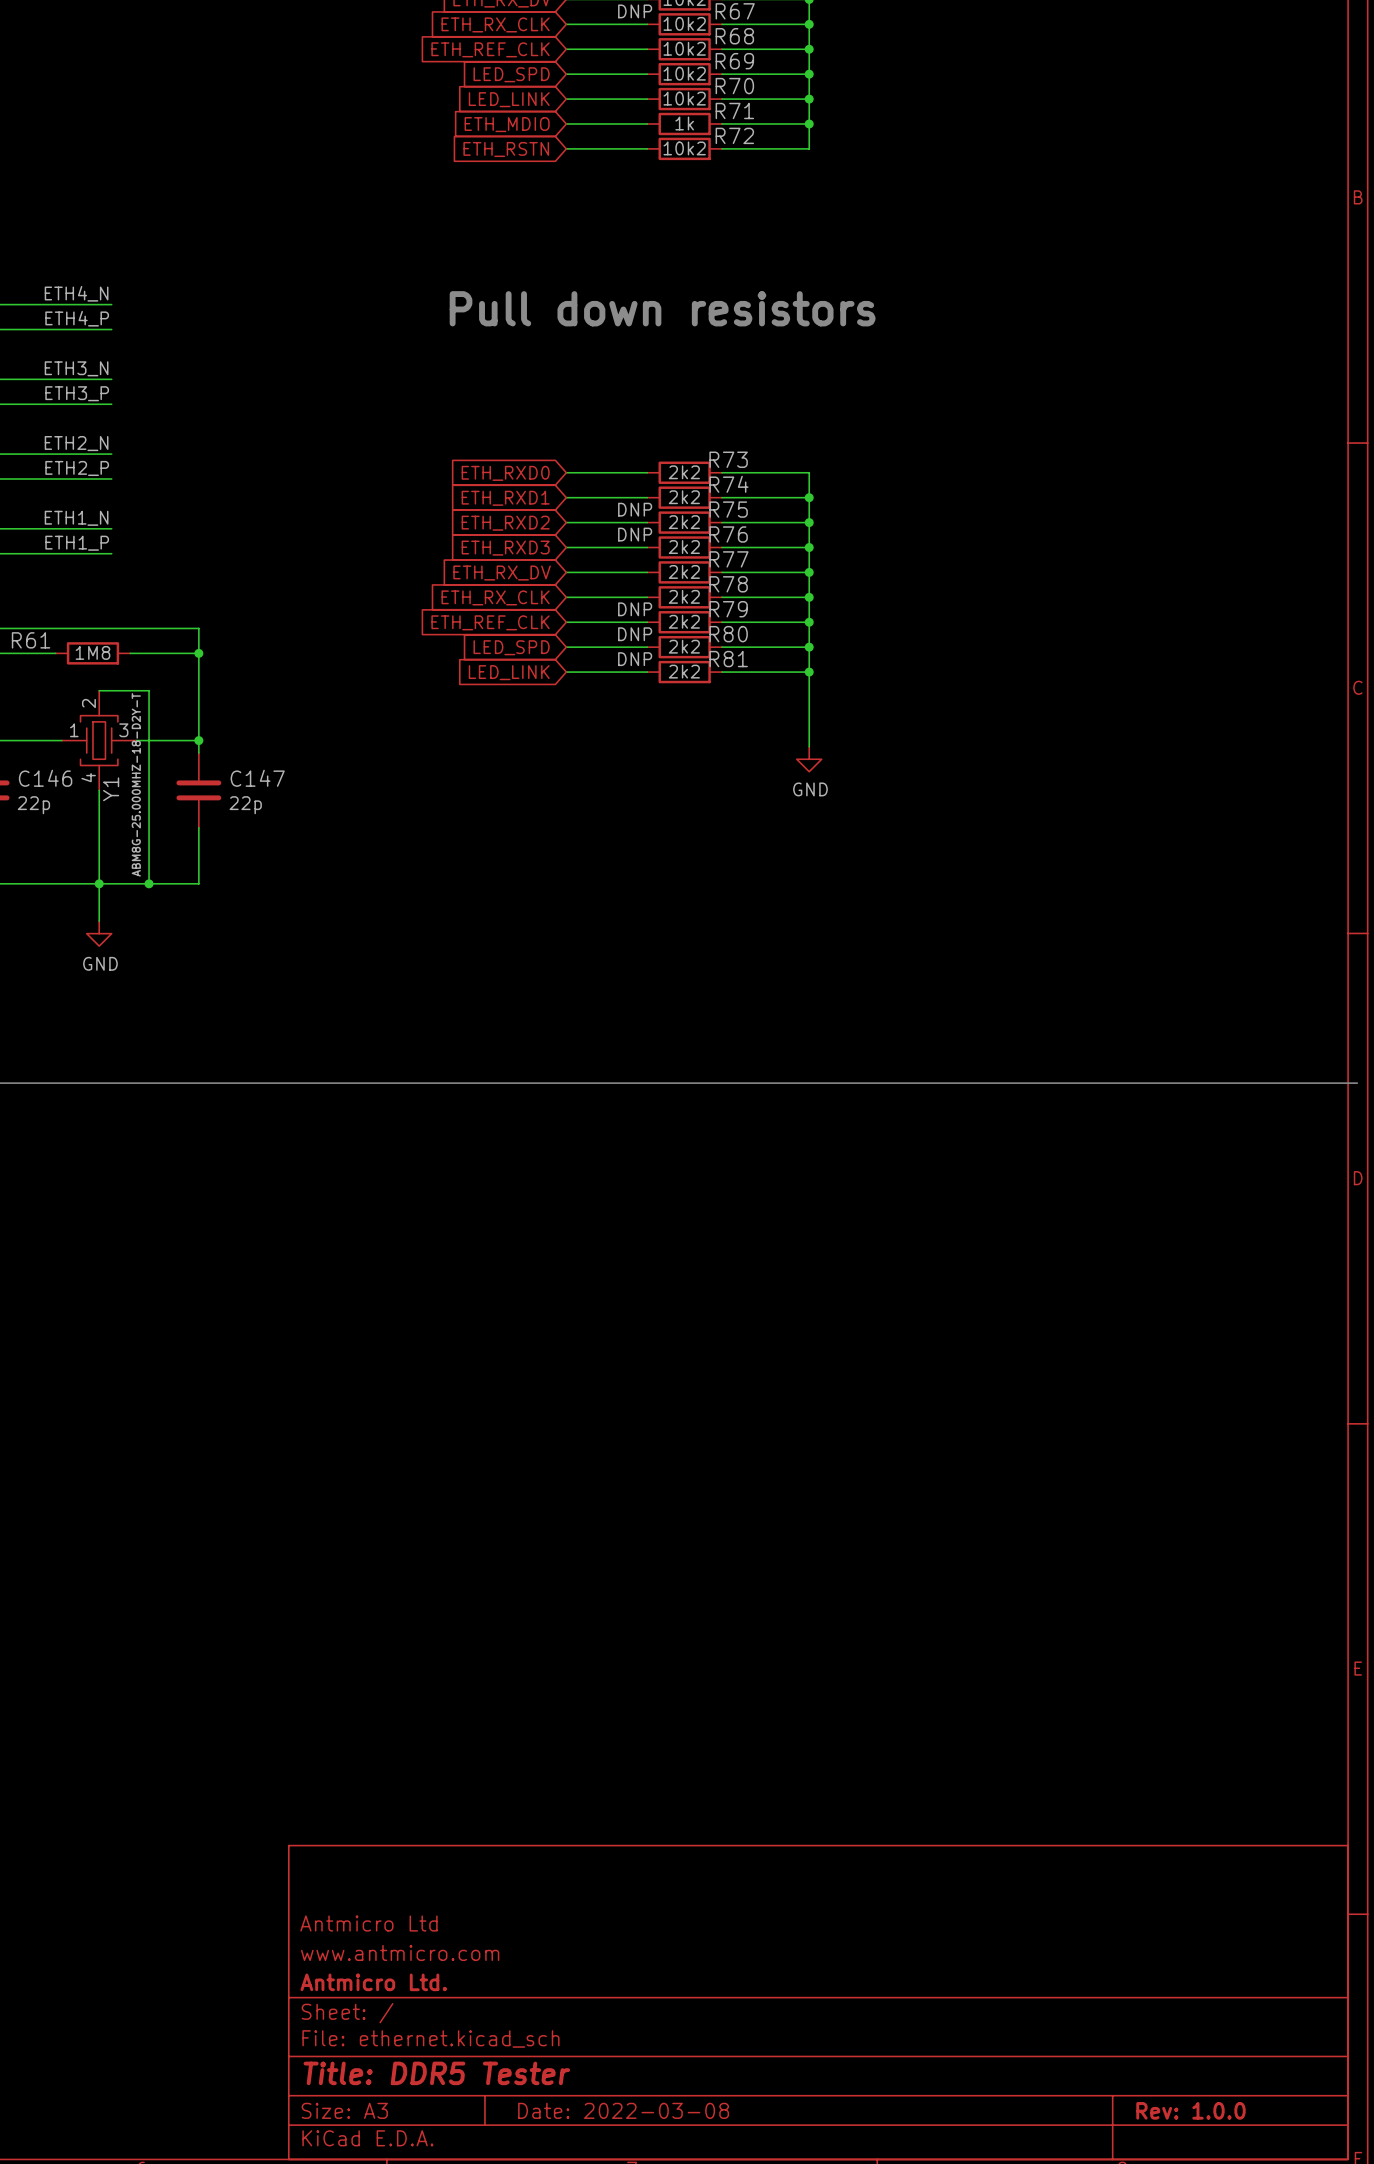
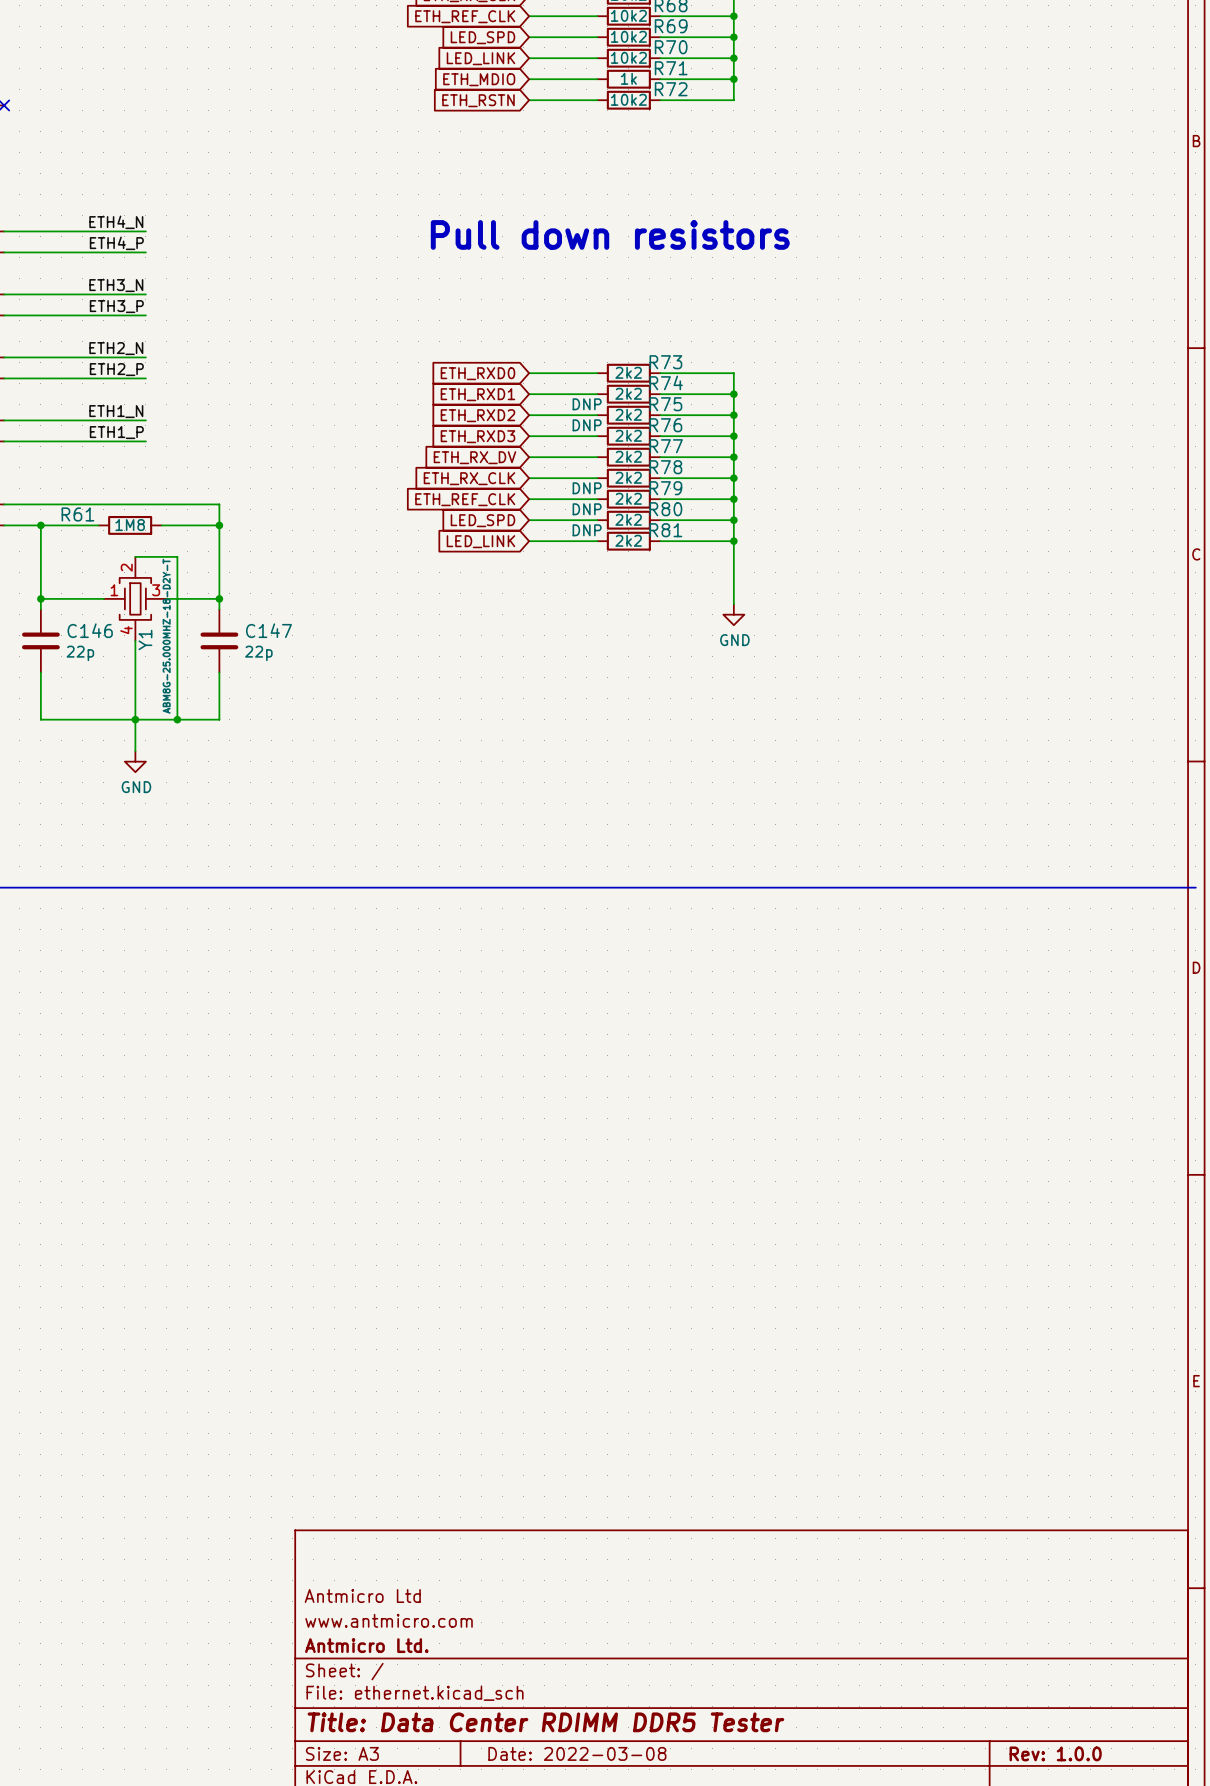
title block: Title: DDR5 Tester (436, 2073) -> Title: Data Center RDIMM DDR5 Tester (545, 1722)

